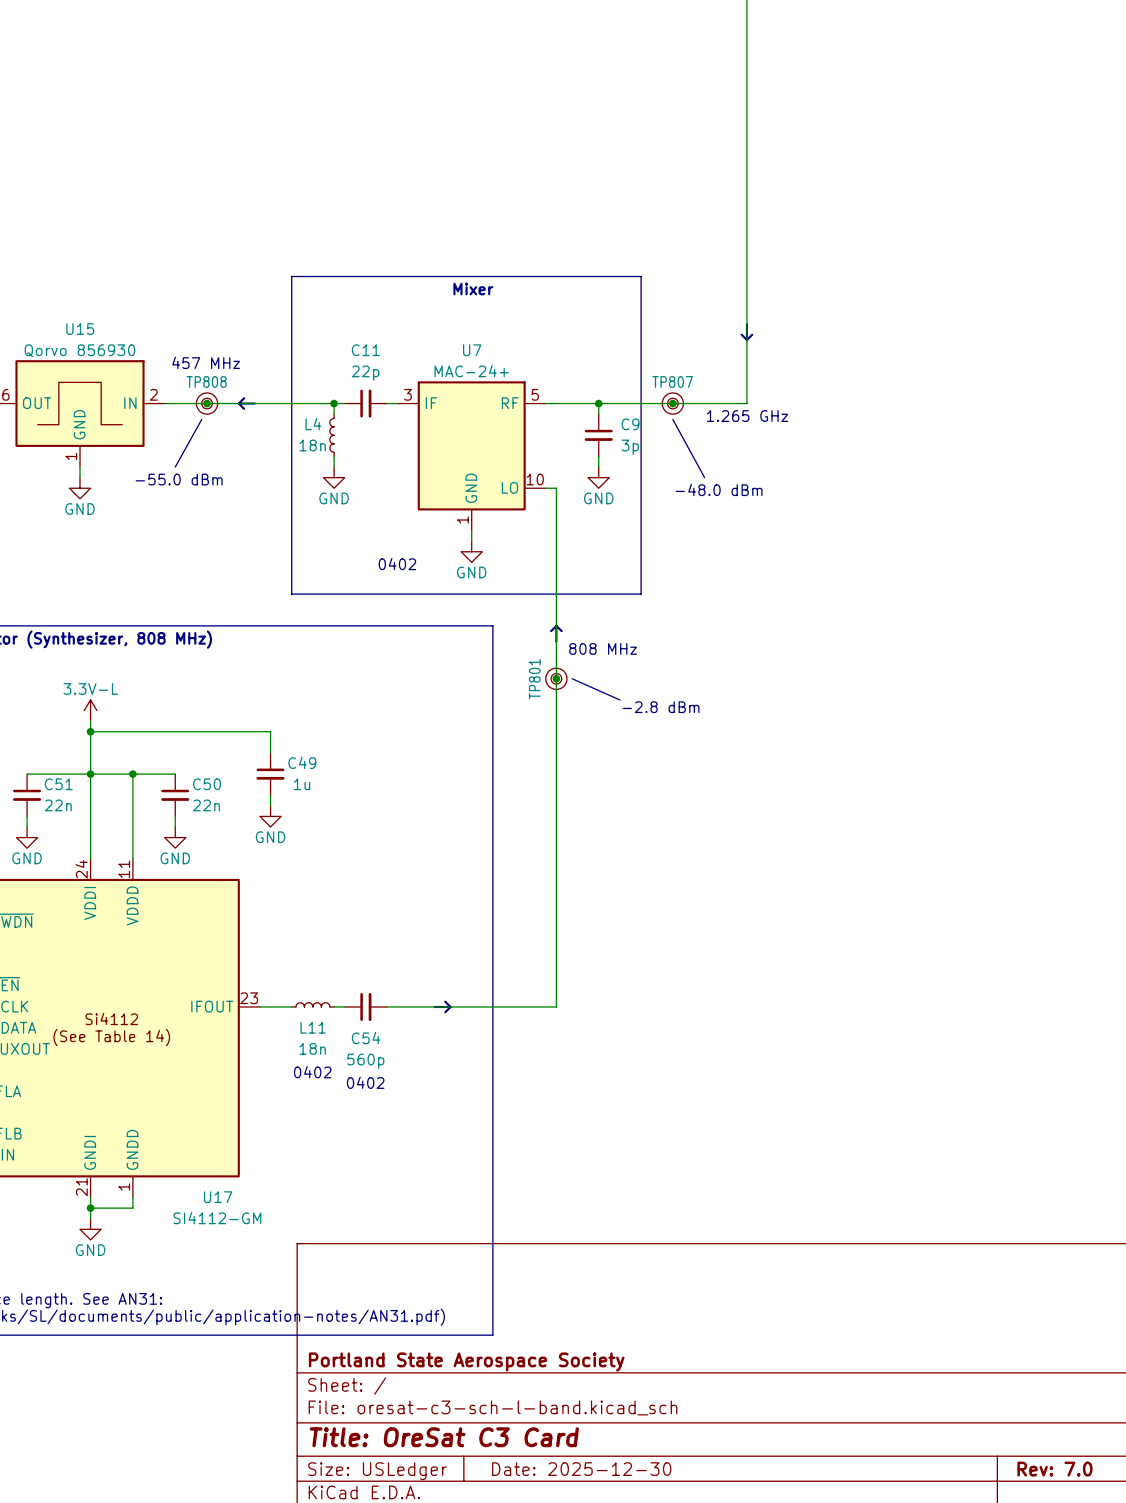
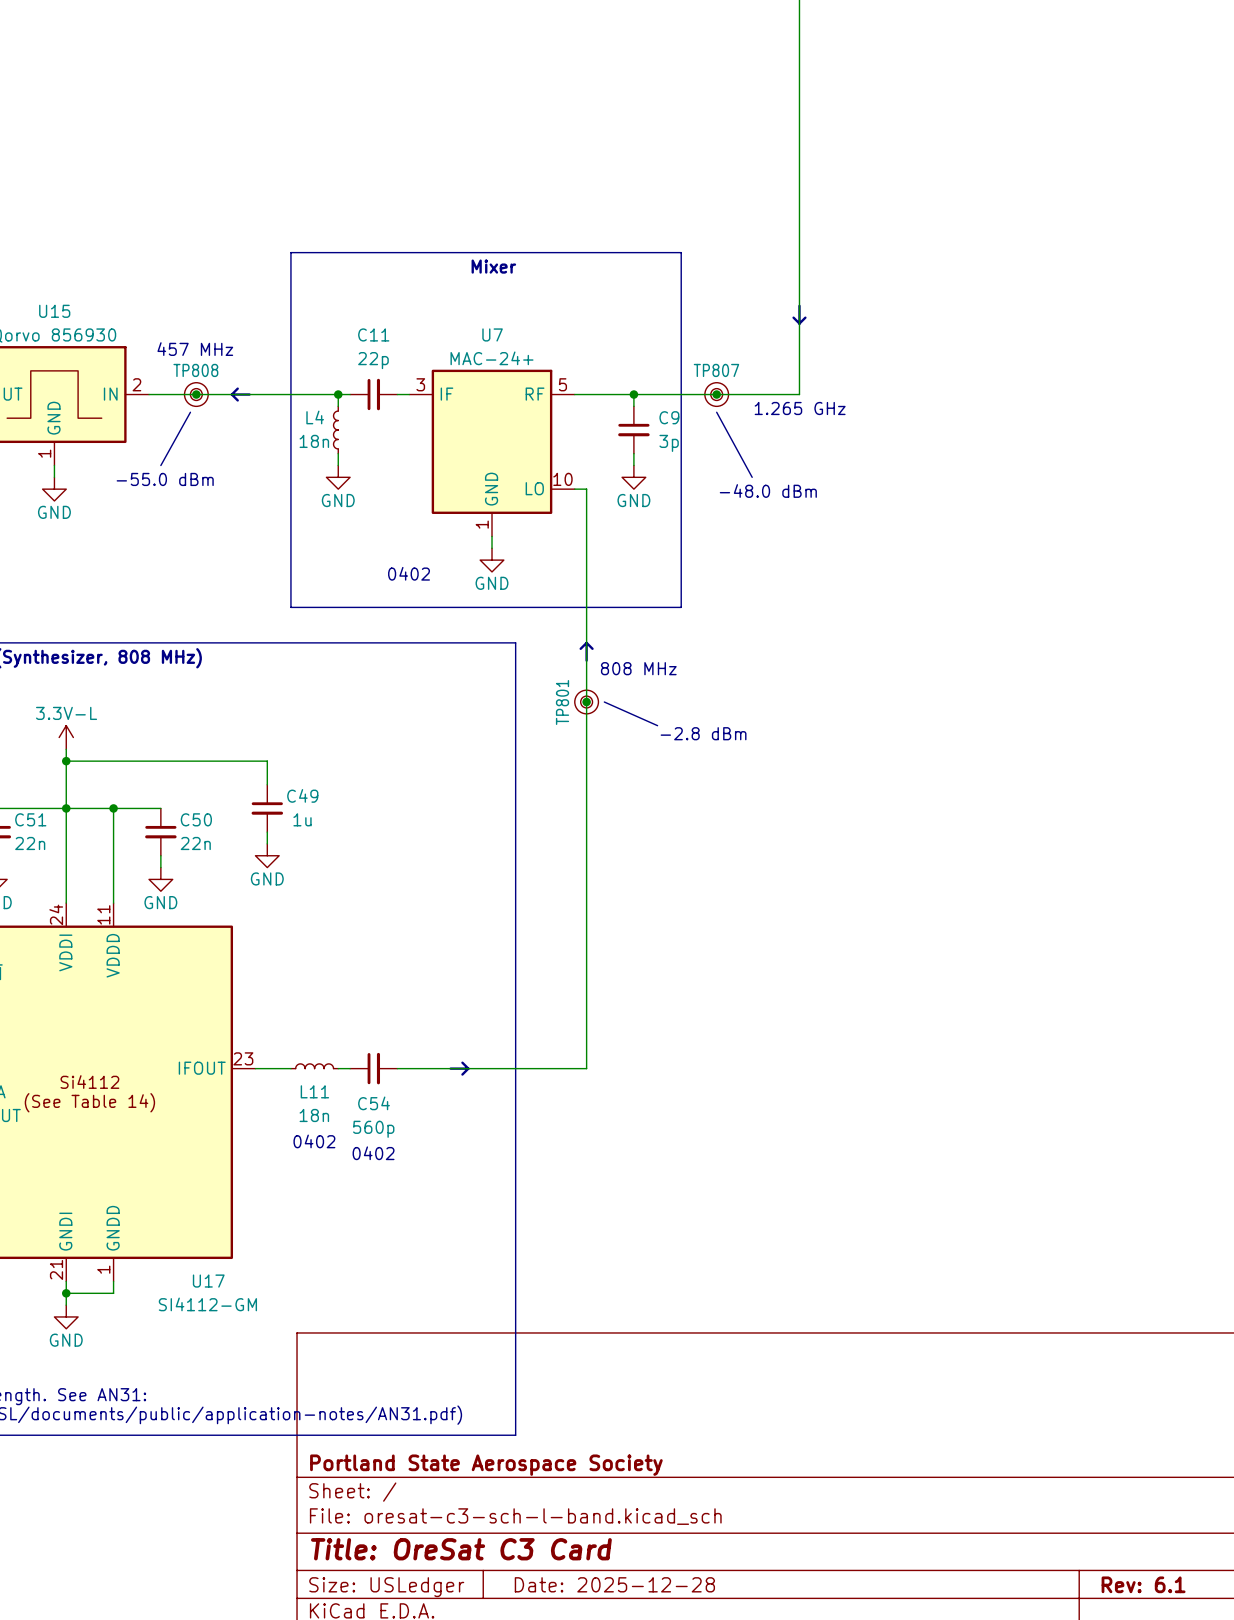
title block: Date: 2025-12-30 (581, 1469) -> Date: 2025-12-28 (614, 1584)
title block: Rev: 7.0 (1054, 1469) -> Rev: 6.1 (1143, 1584)

